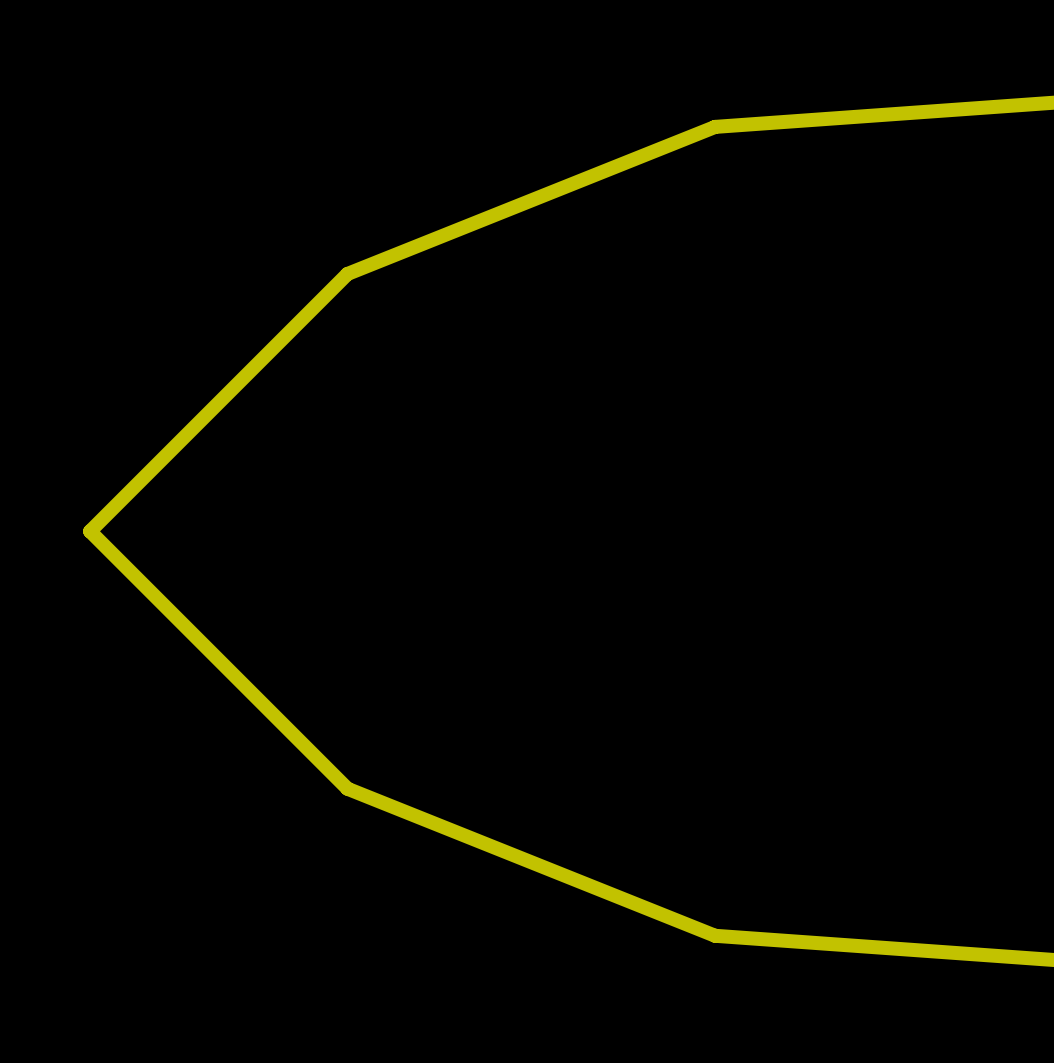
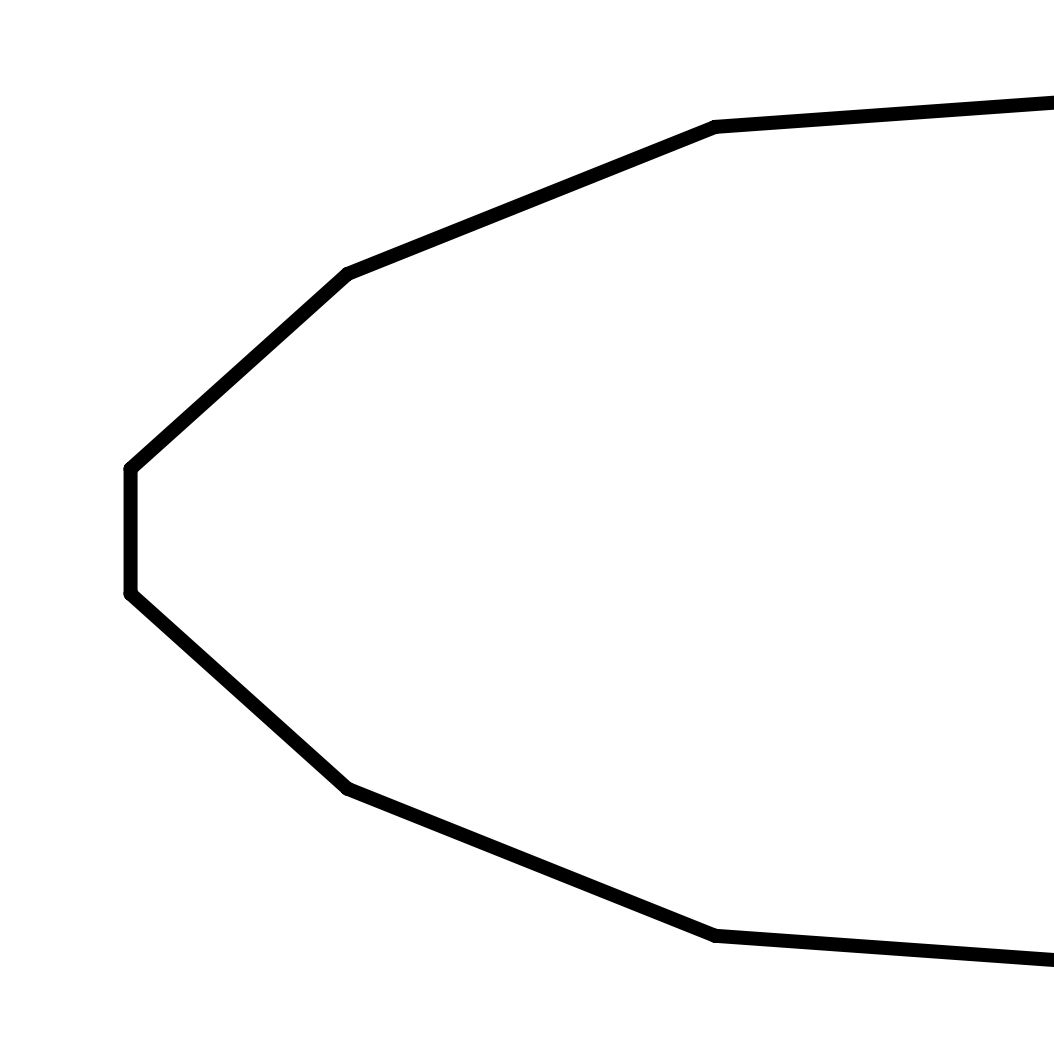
board edge: (347, 273) (90, 531) (347, 788) -> (347, 273) (130, 468) (130, 593) (347, 788)

